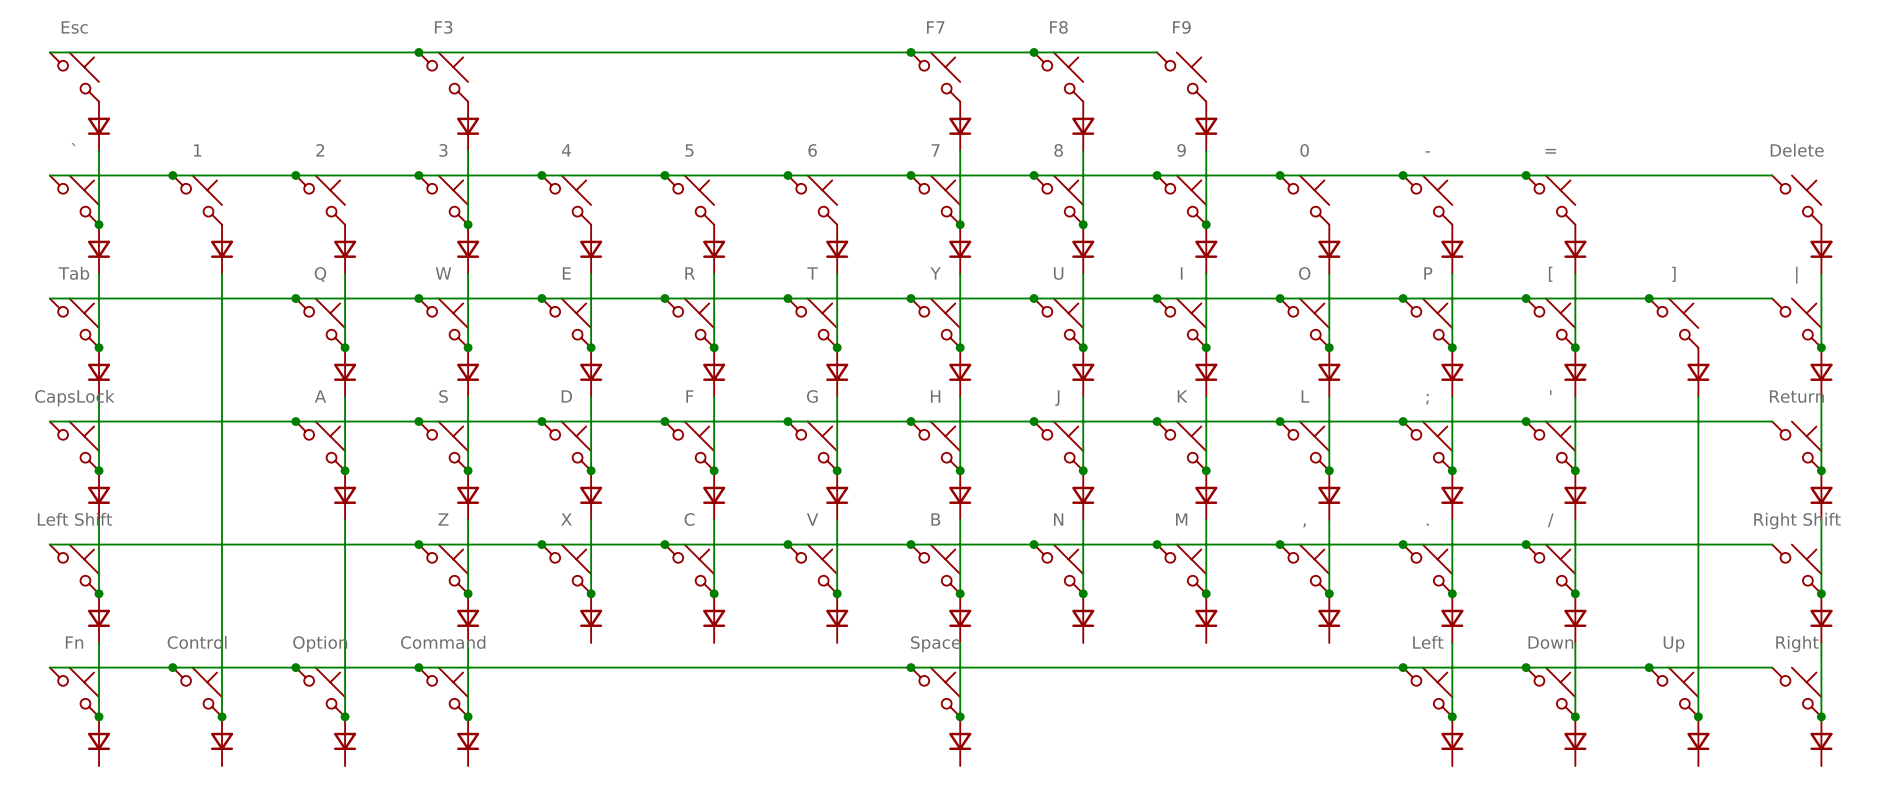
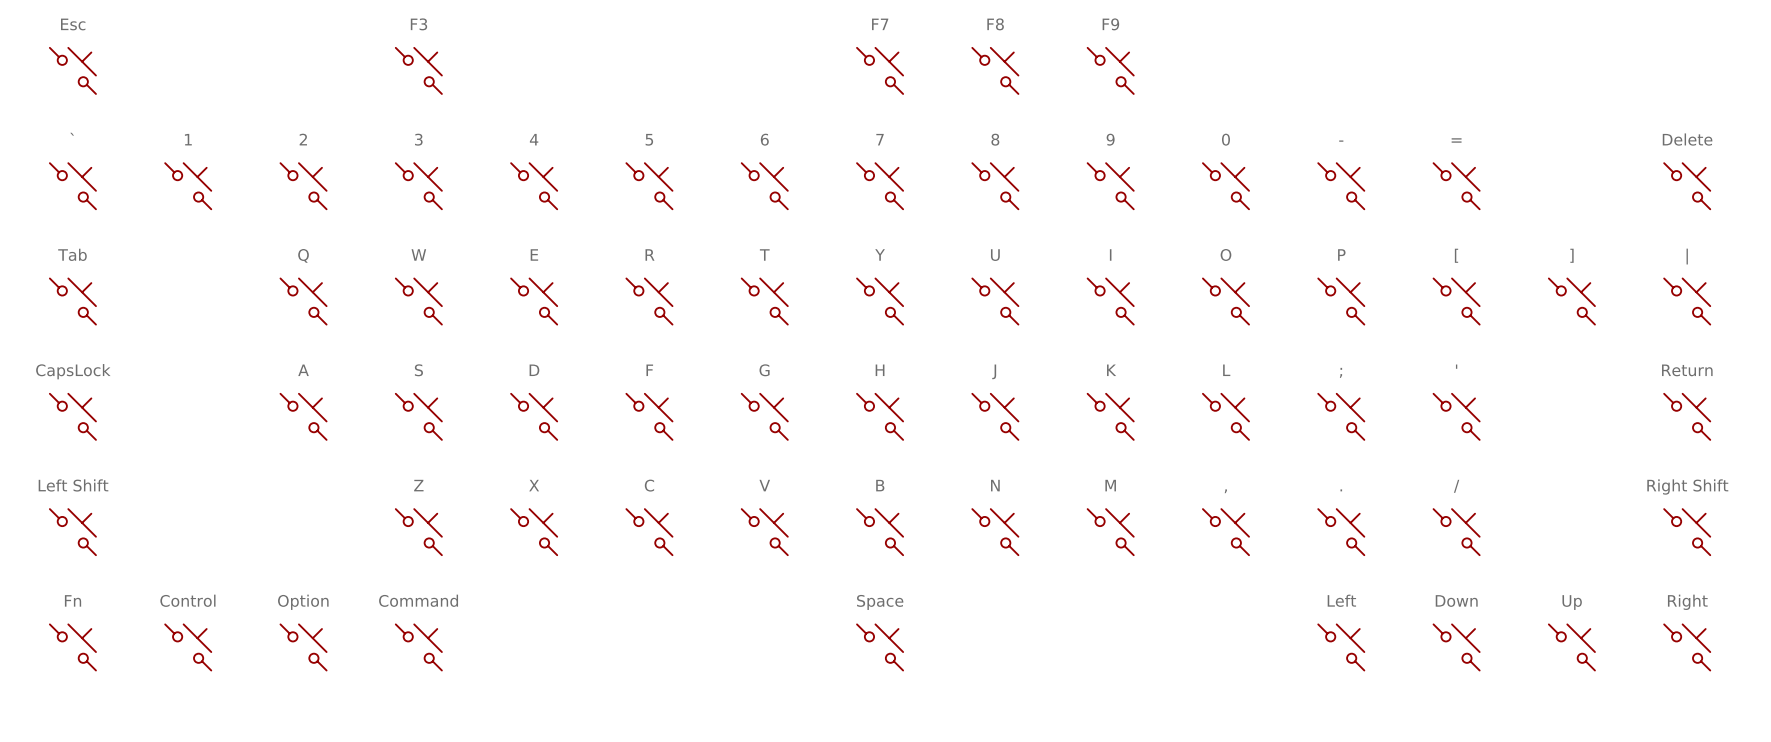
wire: (49, 52) (1157, 52) -> none
junction: (418, 52) -> none
junction: (910, 52) -> none
junction: (1034, 52) -> none
part: (99, 126) -> none
part: (468, 126) -> none
part: (960, 126) -> none
part: (1083, 126) -> none
part: (1206, 126) -> none
wire: (99, 150) (99, 224) -> none
wire: (468, 150) (468, 224) -> none
wire: (960, 150) (960, 224) -> none
wire: (1083, 150) (1083, 224) -> none
wire: (1206, 150) (1206, 224) -> none
wire: (49, 175) (1772, 175) -> none
junction: (172, 175) -> none
junction: (295, 175) -> none
junction: (418, 175) -> none
junction: (541, 175) -> none
junction: (664, 175) -> none
junction: (787, 175) -> none
junction: (910, 175) -> none
junction: (1034, 175) -> none
junction: (1157, 175) -> none
junction: (1280, 175) -> none
junction: (1403, 175) -> none
junction: (1526, 175) -> none
junction: (99, 224) -> none
junction: (468, 224) -> none
junction: (960, 224) -> none
junction: (1083, 224) -> none
junction: (1206, 224) -> none
part: (99, 249) -> none
part: (222, 249) -> none
part: (345, 249) -> none
part: (468, 249) -> none
part: (591, 249) -> none
part: (714, 249) -> none
part: (837, 249) -> none
part: (960, 249) -> none
part: (1083, 249) -> none
part: (1206, 249) -> none
part: (1329, 249) -> none
part: (1452, 249) -> none
part: (1575, 249) -> none
part: (1821, 249) -> none
wire: (99, 273) (99, 347) -> none
wire: (222, 273) (222, 716) -> none
wire: (345, 273) (345, 347) -> none
wire: (468, 273) (468, 347) -> none
wire: (591, 273) (591, 347) -> none
wire: (714, 273) (714, 347) -> none
wire: (837, 273) (837, 347) -> none
wire: (960, 273) (960, 347) -> none
wire: (1083, 273) (1083, 347) -> none
wire: (1206, 273) (1206, 347) -> none
wire: (1329, 273) (1329, 347) -> none
wire: (1452, 273) (1452, 347) -> none
wire: (1575, 273) (1575, 347) -> none
wire: (1821, 273) (1821, 347) -> none
wire: (49, 298) (1772, 298) -> none
junction: (295, 298) -> none
junction: (418, 298) -> none
junction: (541, 298) -> none
junction: (664, 298) -> none
junction: (787, 298) -> none
junction: (910, 298) -> none
junction: (1034, 298) -> none
junction: (1157, 298) -> none
junction: (1280, 298) -> none
junction: (1403, 298) -> none
junction: (1526, 298) -> none
junction: (1649, 298) -> none
junction: (99, 347) -> none
junction: (345, 347) -> none
junction: (468, 347) -> none
junction: (591, 347) -> none
junction: (714, 347) -> none
junction: (837, 347) -> none
junction: (960, 347) -> none
junction: (1083, 347) -> none
junction: (1206, 347) -> none
junction: (1329, 347) -> none
junction: (1452, 347) -> none
junction: (1575, 347) -> none
junction: (1821, 347) -> none
part: (99, 372) -> none
part: (345, 372) -> none
part: (468, 372) -> none
part: (591, 372) -> none
part: (714, 372) -> none
part: (837, 372) -> none
part: (960, 372) -> none
part: (1083, 372) -> none
part: (1206, 372) -> none
part: (1329, 372) -> none
part: (1452, 372) -> none
part: (1575, 372) -> none
part: (1698, 372) -> none
part: (1821, 372) -> none
wire: (99, 396) (99, 470) -> none
wire: (345, 396) (345, 470) -> none
wire: (468, 396) (468, 470) -> none
wire: (591, 396) (591, 470) -> none
wire: (714, 396) (714, 470) -> none
wire: (837, 396) (837, 470) -> none
wire: (960, 396) (960, 470) -> none
wire: (1083, 396) (1083, 470) -> none
wire: (1206, 396) (1206, 470) -> none
wire: (1329, 396) (1329, 470) -> none
wire: (1452, 396) (1452, 470) -> none
wire: (1575, 396) (1575, 470) -> none
wire: (1698, 396) (1698, 716) -> none
wire: (1821, 396) (1821, 470) -> none
wire: (49, 421) (1772, 421) -> none
junction: (295, 421) -> none
junction: (418, 421) -> none
junction: (541, 421) -> none
junction: (664, 421) -> none
junction: (787, 421) -> none
junction: (910, 421) -> none
junction: (1034, 421) -> none
junction: (1157, 421) -> none
junction: (1280, 421) -> none
junction: (1403, 421) -> none
junction: (1526, 421) -> none
junction: (99, 470) -> none
junction: (345, 470) -> none
junction: (468, 470) -> none
junction: (591, 470) -> none
junction: (714, 470) -> none
junction: (837, 470) -> none
junction: (960, 470) -> none
junction: (1083, 470) -> none
junction: (1206, 470) -> none
junction: (1329, 470) -> none
junction: (1452, 470) -> none
junction: (1575, 470) -> none
junction: (1821, 470) -> none
part: (99, 495) -> none
part: (345, 495) -> none
part: (468, 495) -> none
part: (591, 495) -> none
part: (714, 495) -> none
part: (837, 495) -> none
part: (960, 495) -> none
part: (1083, 495) -> none
part: (1206, 495) -> none
part: (1329, 495) -> none
part: (1452, 495) -> none
part: (1575, 495) -> none
part: (1821, 495) -> none
wire: (99, 519) (99, 593) -> none
wire: (345, 519) (345, 716) -> none
wire: (468, 519) (468, 593) -> none
wire: (591, 519) (591, 593) -> none
wire: (714, 519) (714, 593) -> none
wire: (837, 519) (837, 593) -> none
wire: (960, 519) (960, 593) -> none
wire: (1083, 519) (1083, 593) -> none
wire: (1206, 519) (1206, 593) -> none
wire: (1329, 519) (1329, 593) -> none
wire: (1452, 519) (1452, 593) -> none
wire: (1575, 519) (1575, 593) -> none
wire: (1821, 519) (1821, 593) -> none
wire: (49, 544) (1772, 544) -> none
junction: (418, 544) -> none
junction: (541, 544) -> none
junction: (664, 544) -> none
junction: (787, 544) -> none
junction: (910, 544) -> none
junction: (1034, 544) -> none
junction: (1157, 544) -> none
junction: (1280, 544) -> none
junction: (1403, 544) -> none
junction: (1526, 544) -> none
junction: (99, 593) -> none
junction: (468, 593) -> none
junction: (591, 593) -> none
junction: (714, 593) -> none
junction: (837, 593) -> none
junction: (960, 593) -> none
junction: (1083, 593) -> none
junction: (1206, 593) -> none
junction: (1329, 593) -> none
junction: (1452, 593) -> none
junction: (1575, 593) -> none
junction: (1821, 593) -> none
part: (99, 618) -> none
part: (468, 618) -> none
part: (591, 618) -> none
part: (714, 618) -> none
part: (837, 618) -> none
part: (960, 618) -> none
part: (1083, 618) -> none
part: (1206, 618) -> none
part: (1329, 618) -> none
part: (1452, 618) -> none
part: (1575, 618) -> none
part: (1821, 618) -> none
wire: (99, 642) (99, 716) -> none
wire: (468, 642) (468, 716) -> none
wire: (960, 642) (960, 716) -> none
wire: (1452, 642) (1452, 716) -> none
wire: (1575, 642) (1575, 716) -> none
wire: (1821, 642) (1821, 716) -> none
wire: (49, 667) (1772, 667) -> none
junction: (172, 667) -> none
junction: (295, 667) -> none
junction: (418, 667) -> none
junction: (910, 667) -> none
junction: (1403, 667) -> none
junction: (1526, 667) -> none
junction: (1649, 667) -> none
junction: (99, 716) -> none
junction: (222, 716) -> none
junction: (345, 716) -> none
junction: (468, 716) -> none
junction: (960, 716) -> none
junction: (1452, 716) -> none
junction: (1575, 716) -> none
junction: (1698, 716) -> none
junction: (1821, 716) -> none
part: (99, 741) -> none
part: (222, 741) -> none
part: (345, 741) -> none
part: (468, 741) -> none
part: (960, 741) -> none
part: (1452, 741) -> none
part: (1575, 741) -> none
part: (1698, 741) -> none
part: (1821, 741) -> none

